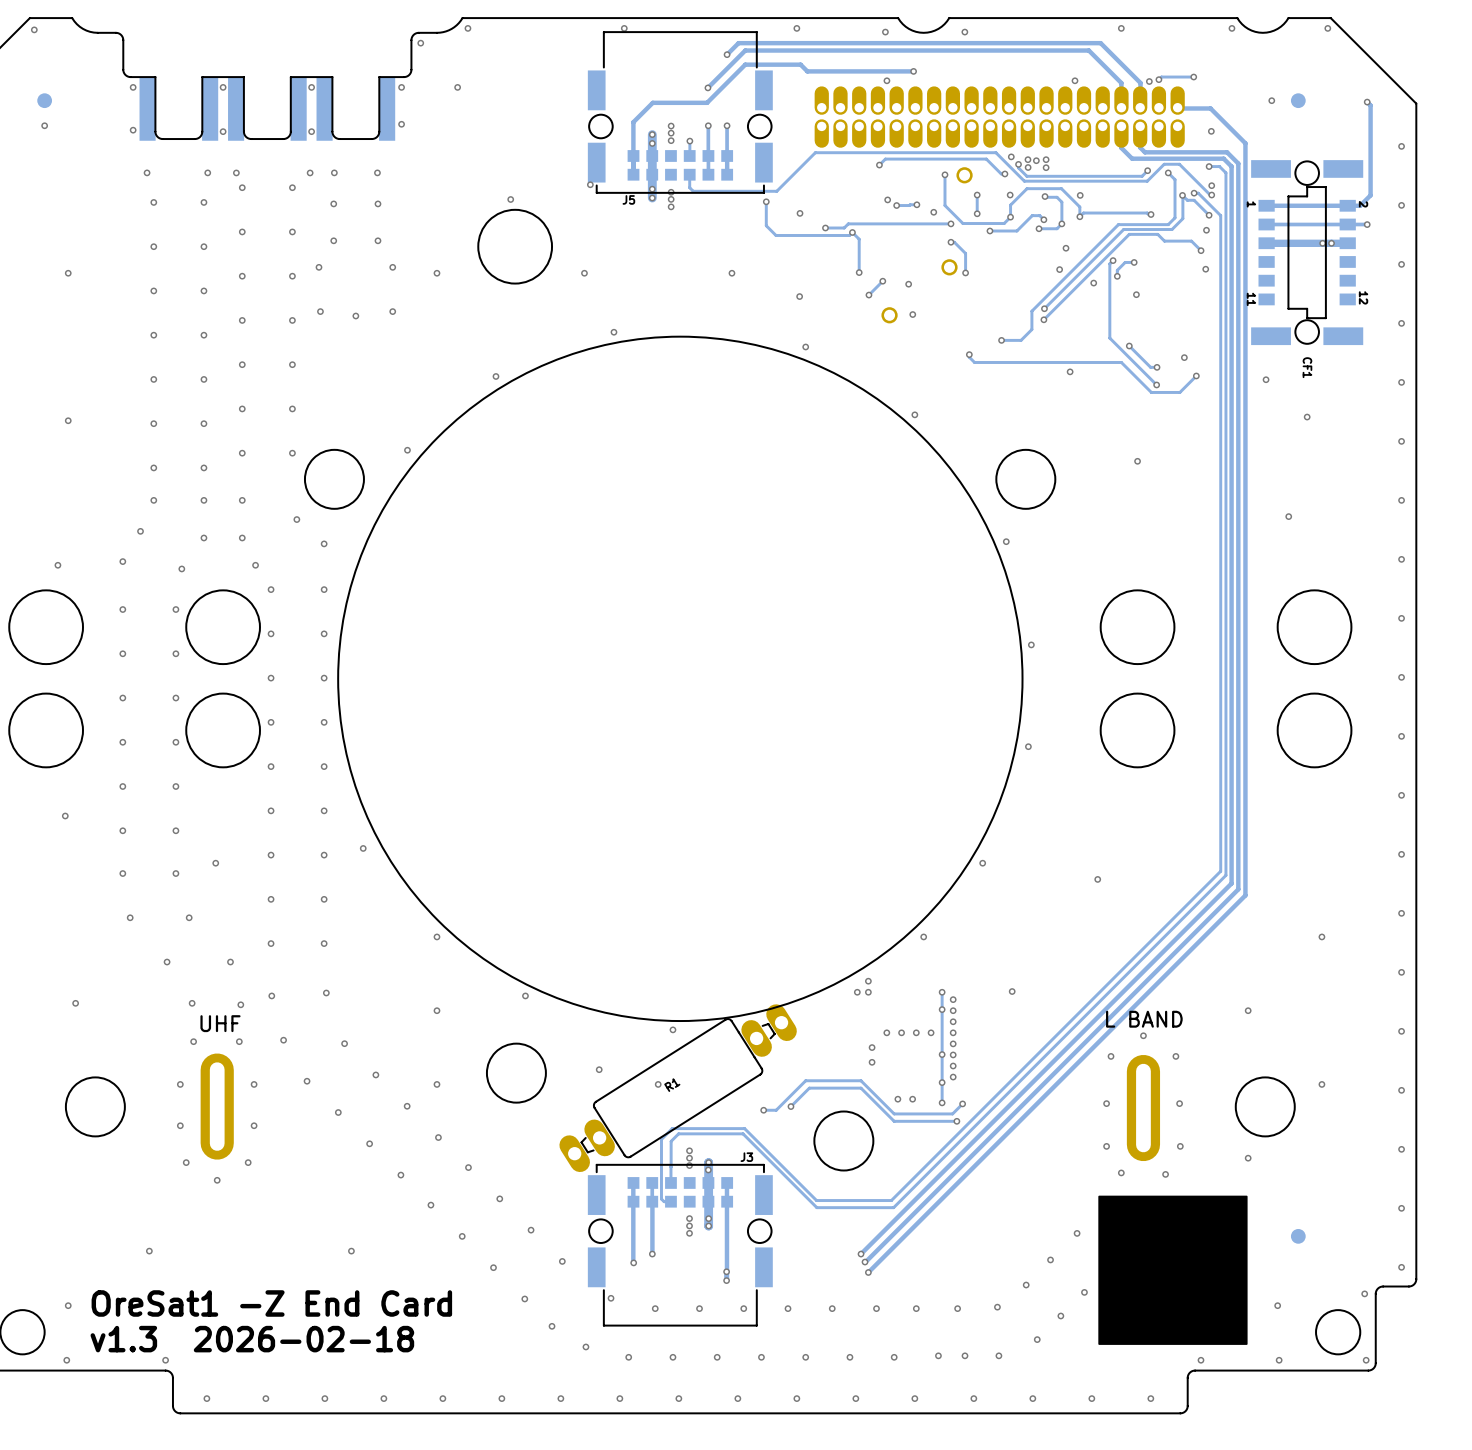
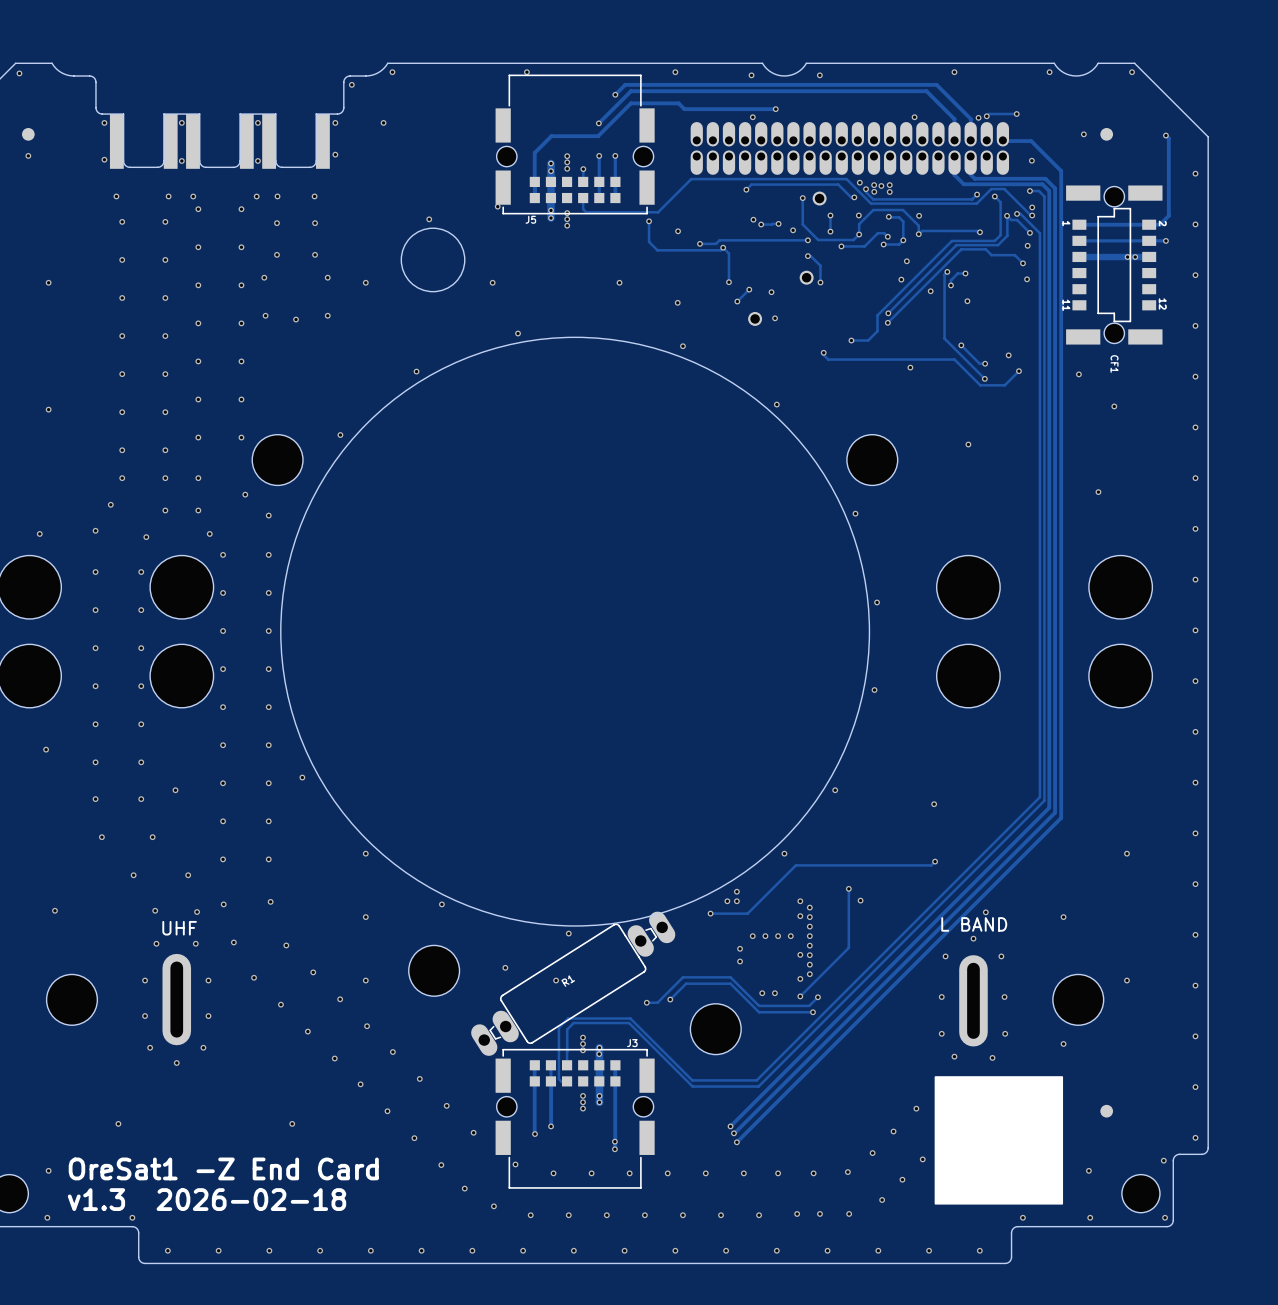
track: none -> (935, 861) (931, 865) (795, 865) (747, 913) (710, 913)
via: none -> (935, 861)
via: none -> (848, 888)
track: (942, 992) (942, 1102) -> (848, 888) (848, 947) (800, 996)
via: none -> (985, 912)
via: none -> (710, 913)

